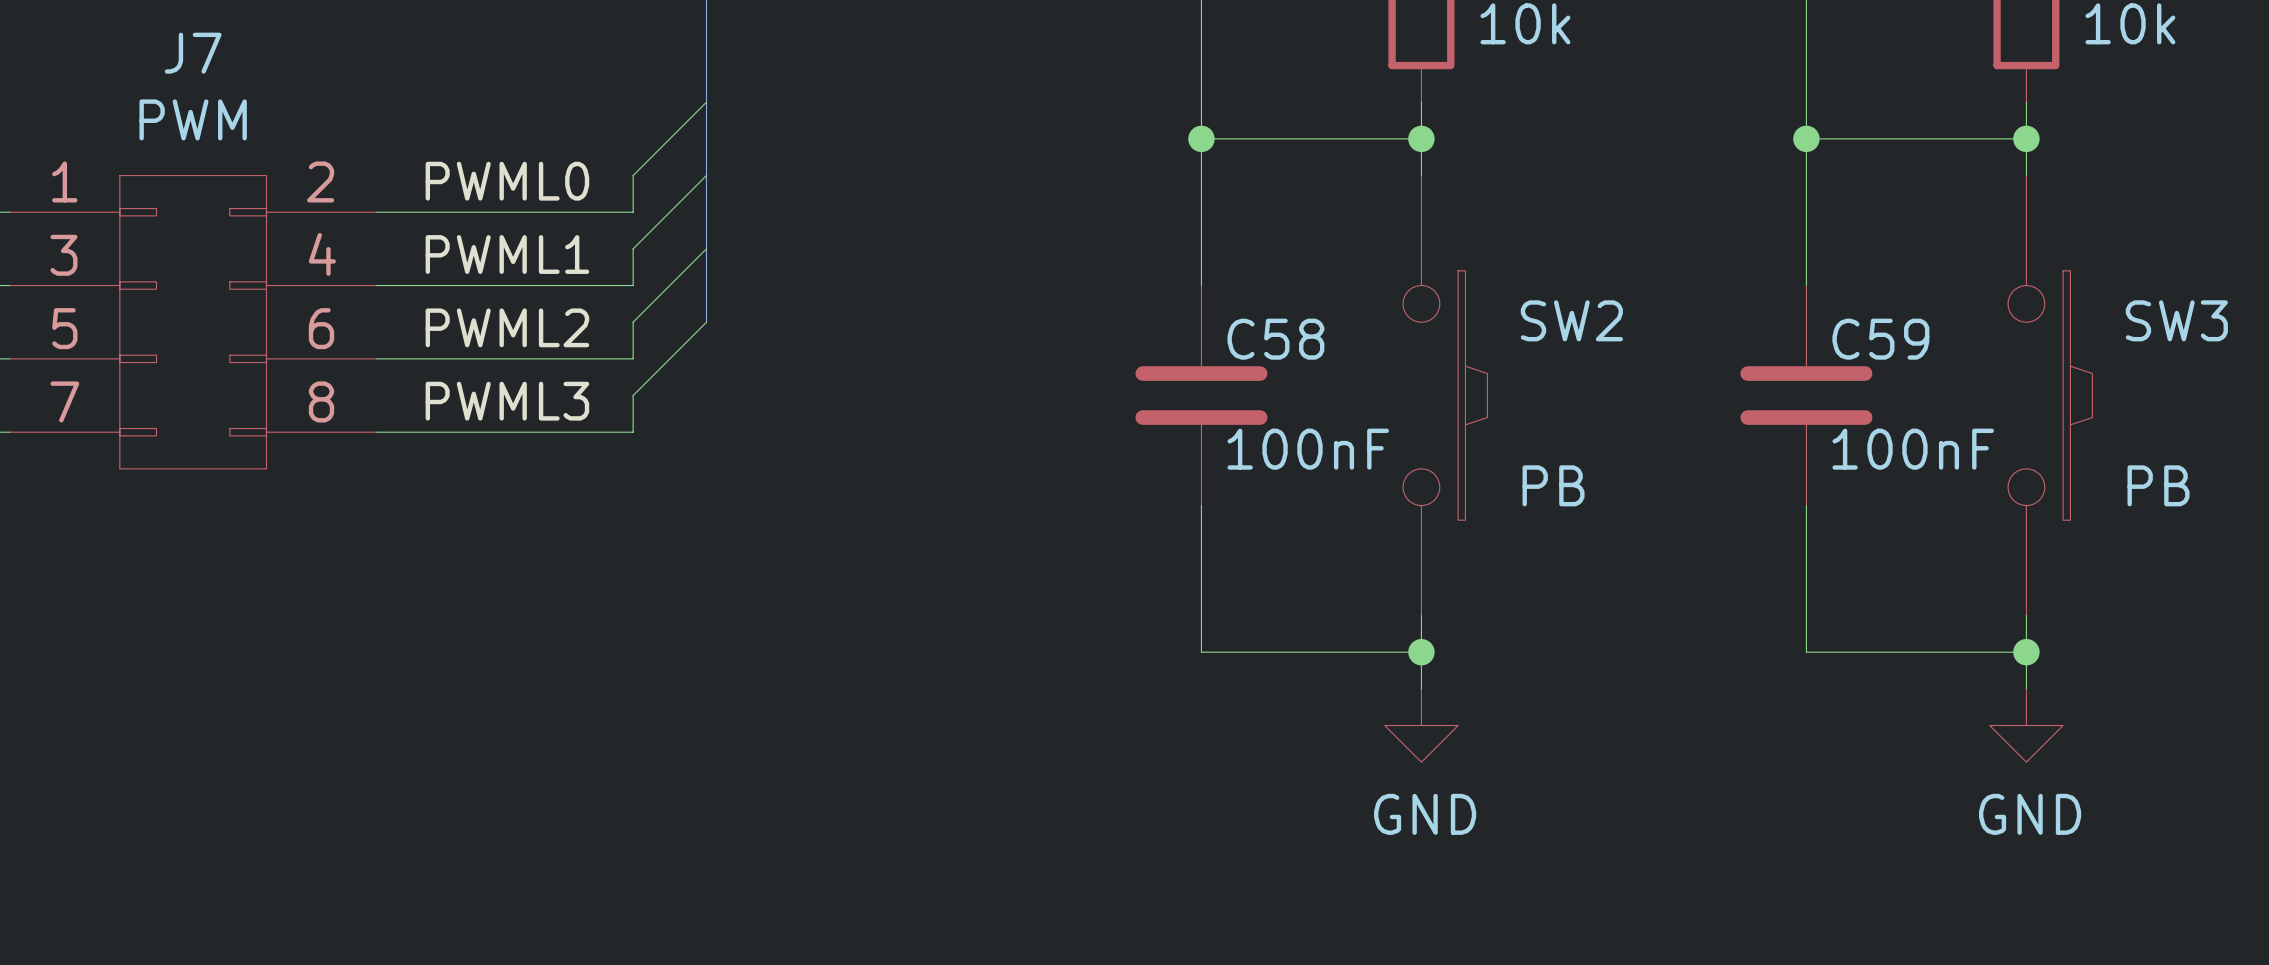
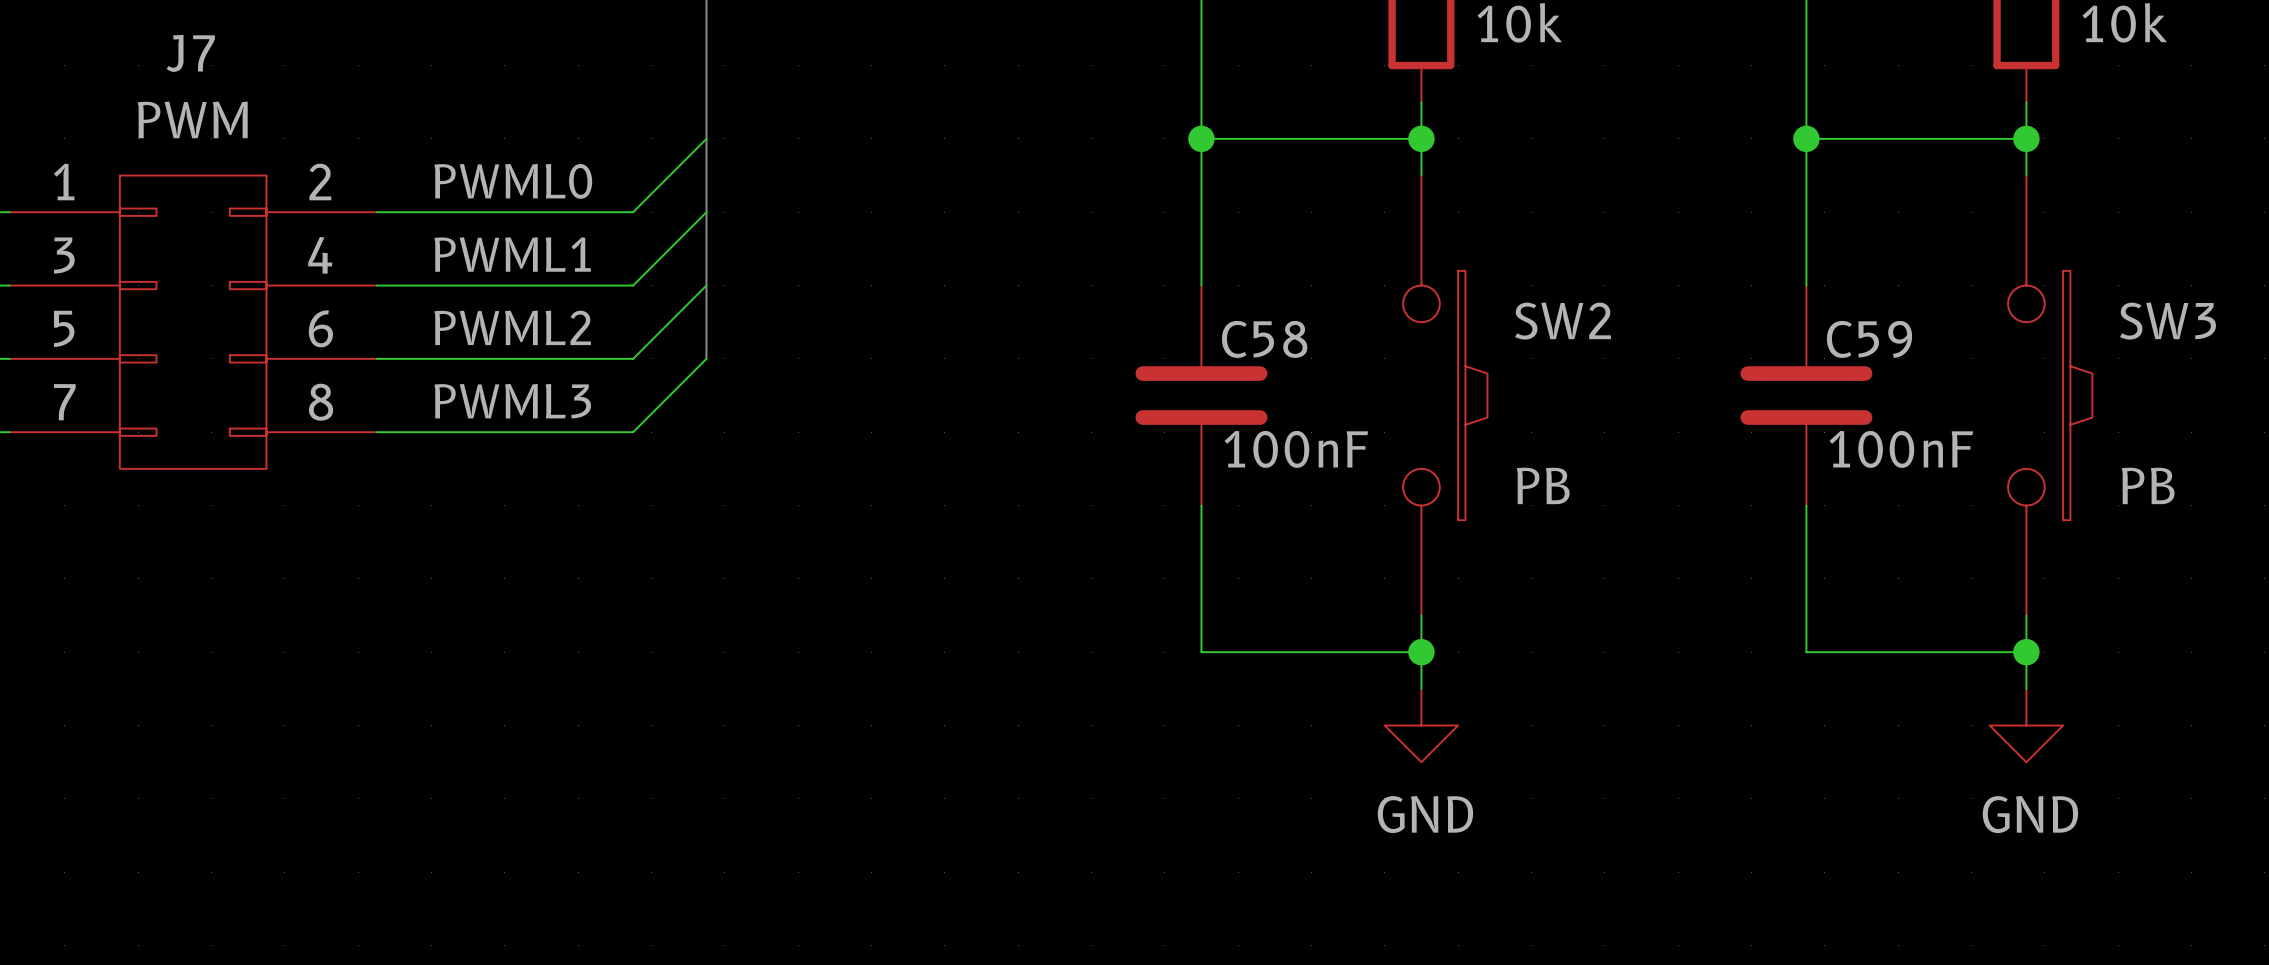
wire: (706, 102) (633, 175) (633, 212) -> (706, 138) (633, 212)
wire: (706, 175) (633, 248) (633, 285) -> (706, 212) (633, 285)
wire: (706, 248) (633, 322) (633, 358) -> (706, 285) (633, 358)
wire: (706, 322) (633, 395) (633, 432) -> (706, 358) (633, 432)
bus: none -> (706, 322) (706, 358)

